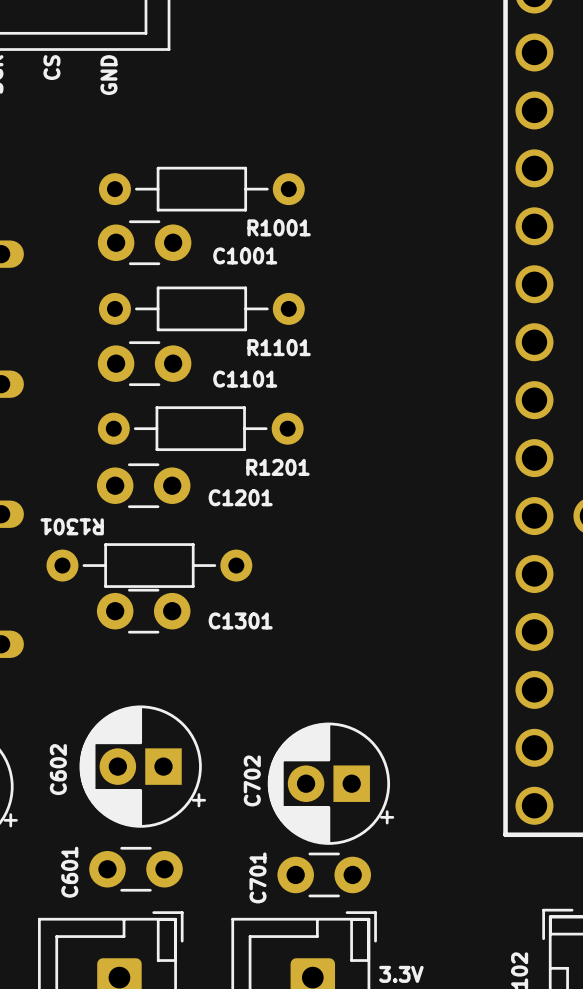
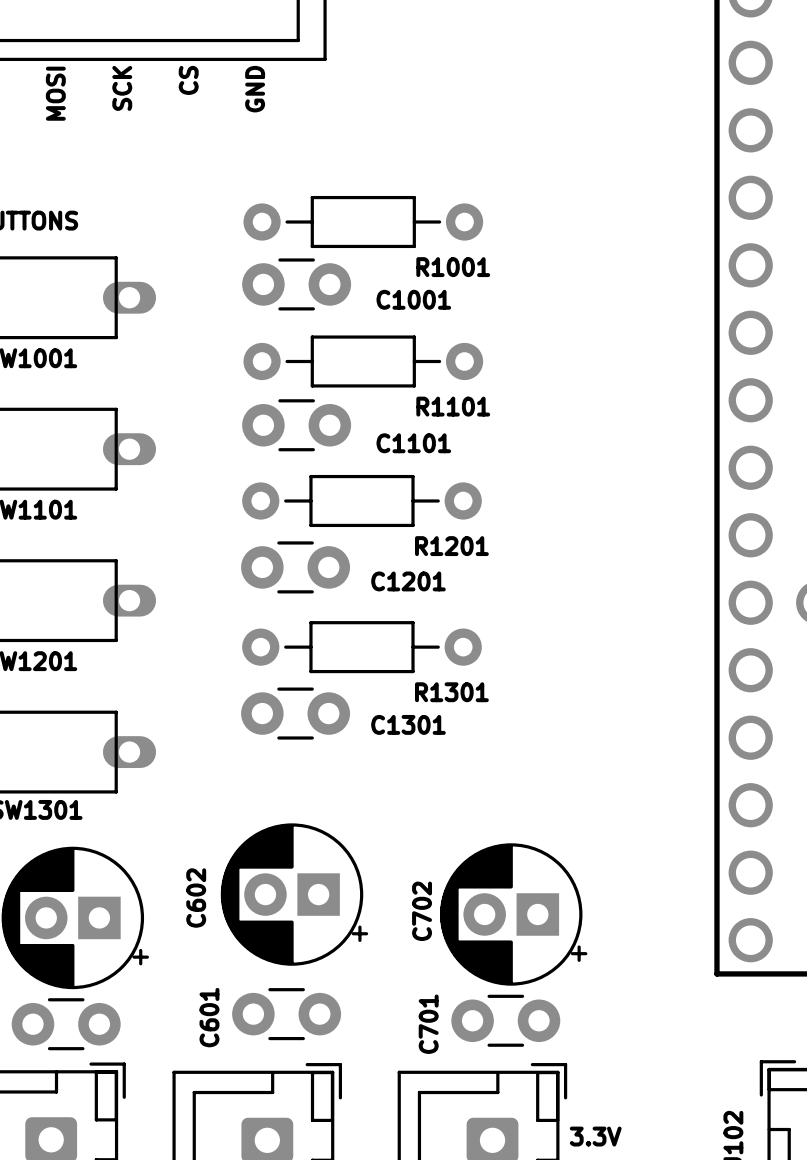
R1301 name rotation: 0° (72, 526) -> 180° (451, 692)
R1301 name position: R1301 (72, 526) -> R1301 (451, 692)
R1301 position: (149, 565) -> (361, 647)

